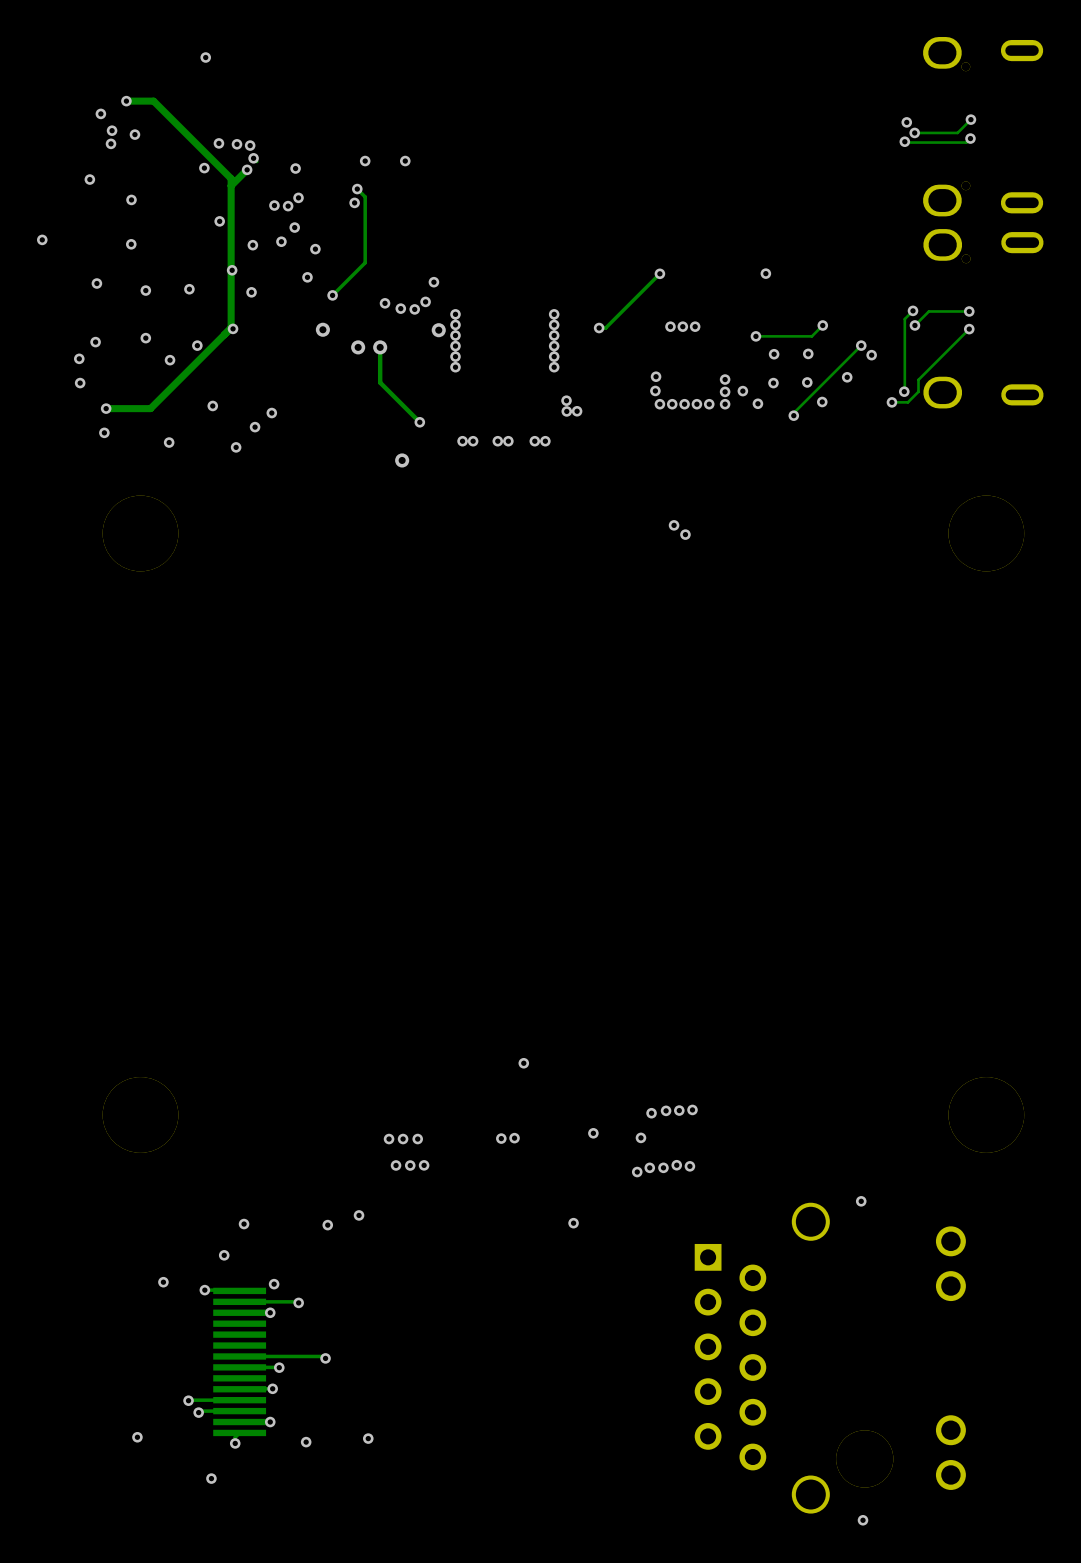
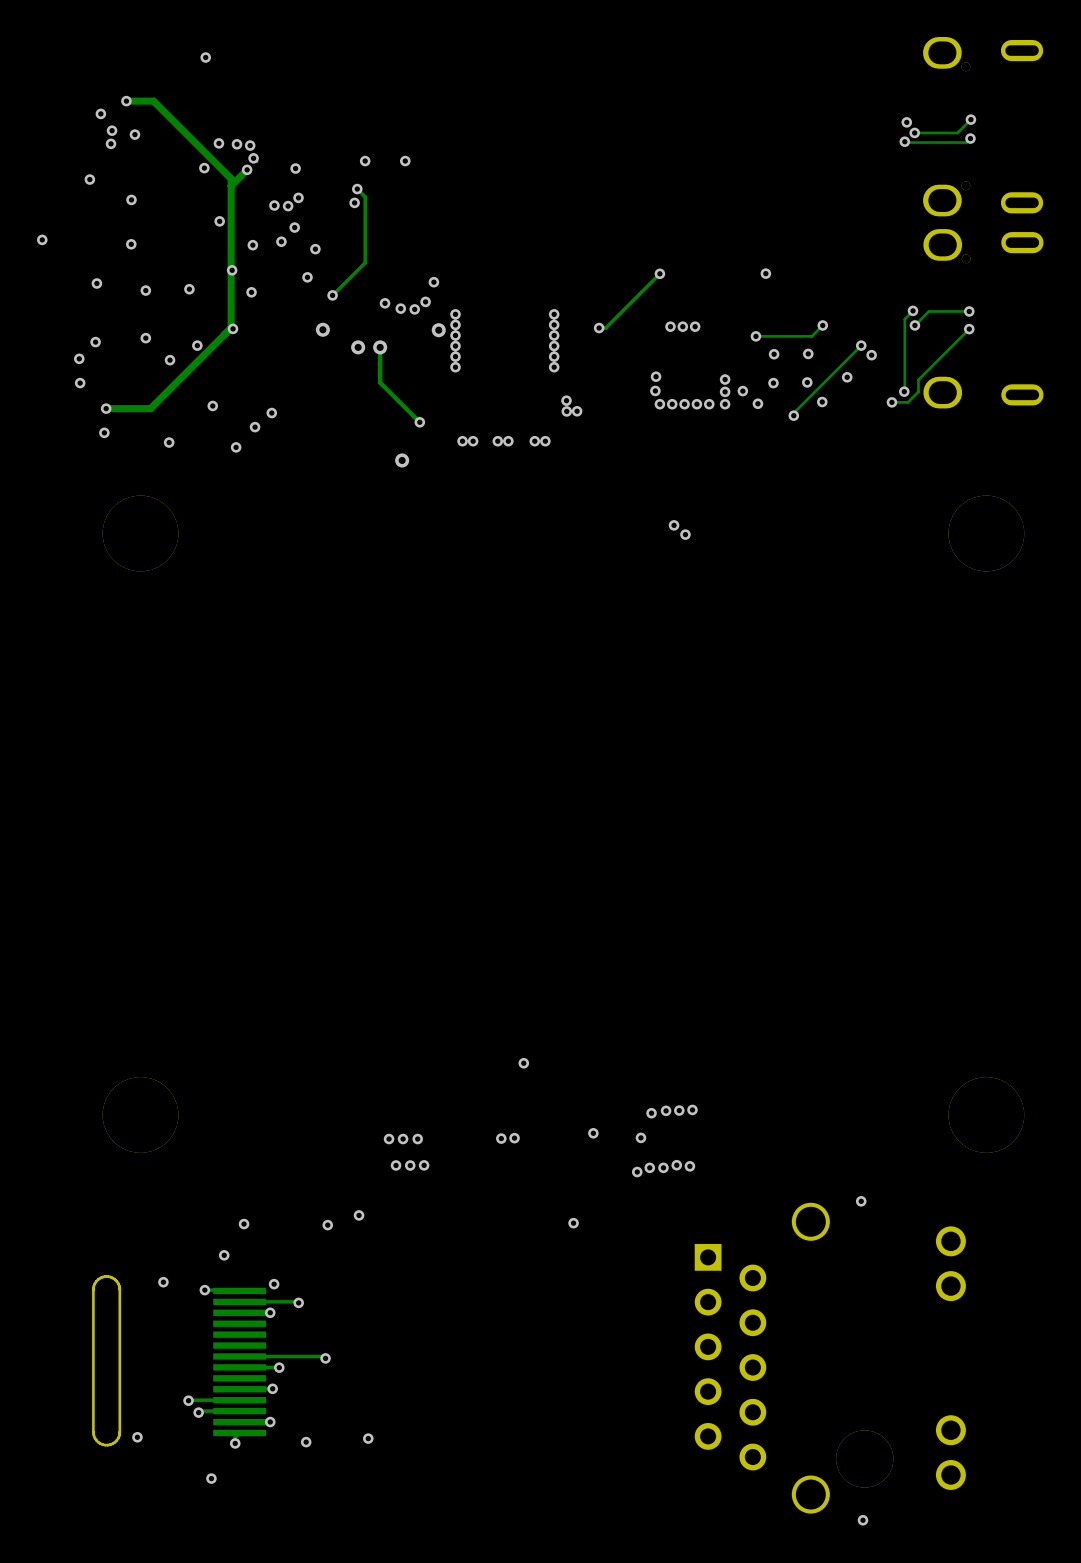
board edge: none -> (107, 1276) (114, 1279) (119, 1288) (119, 1431) (114, 1442) (105, 1445) (96, 1440) (93, 1433) (93, 1289) (98, 1279) (107, 1276)

